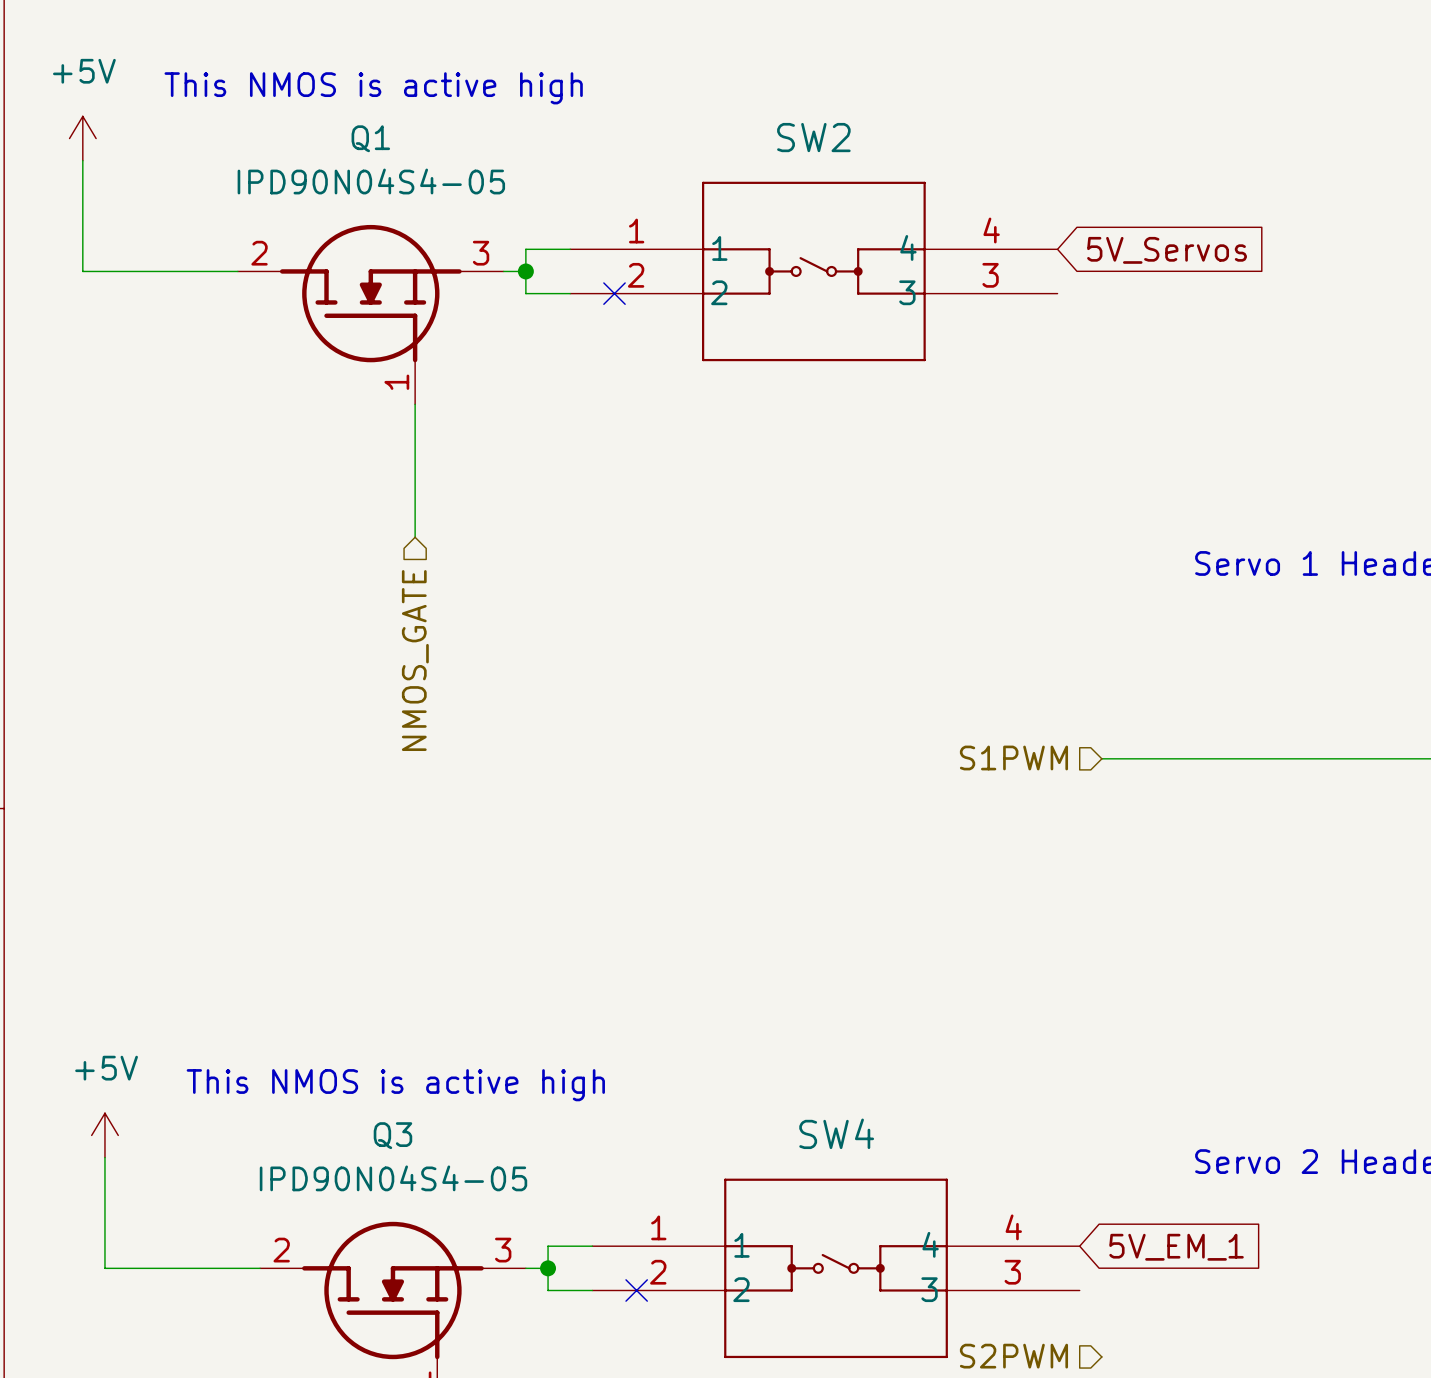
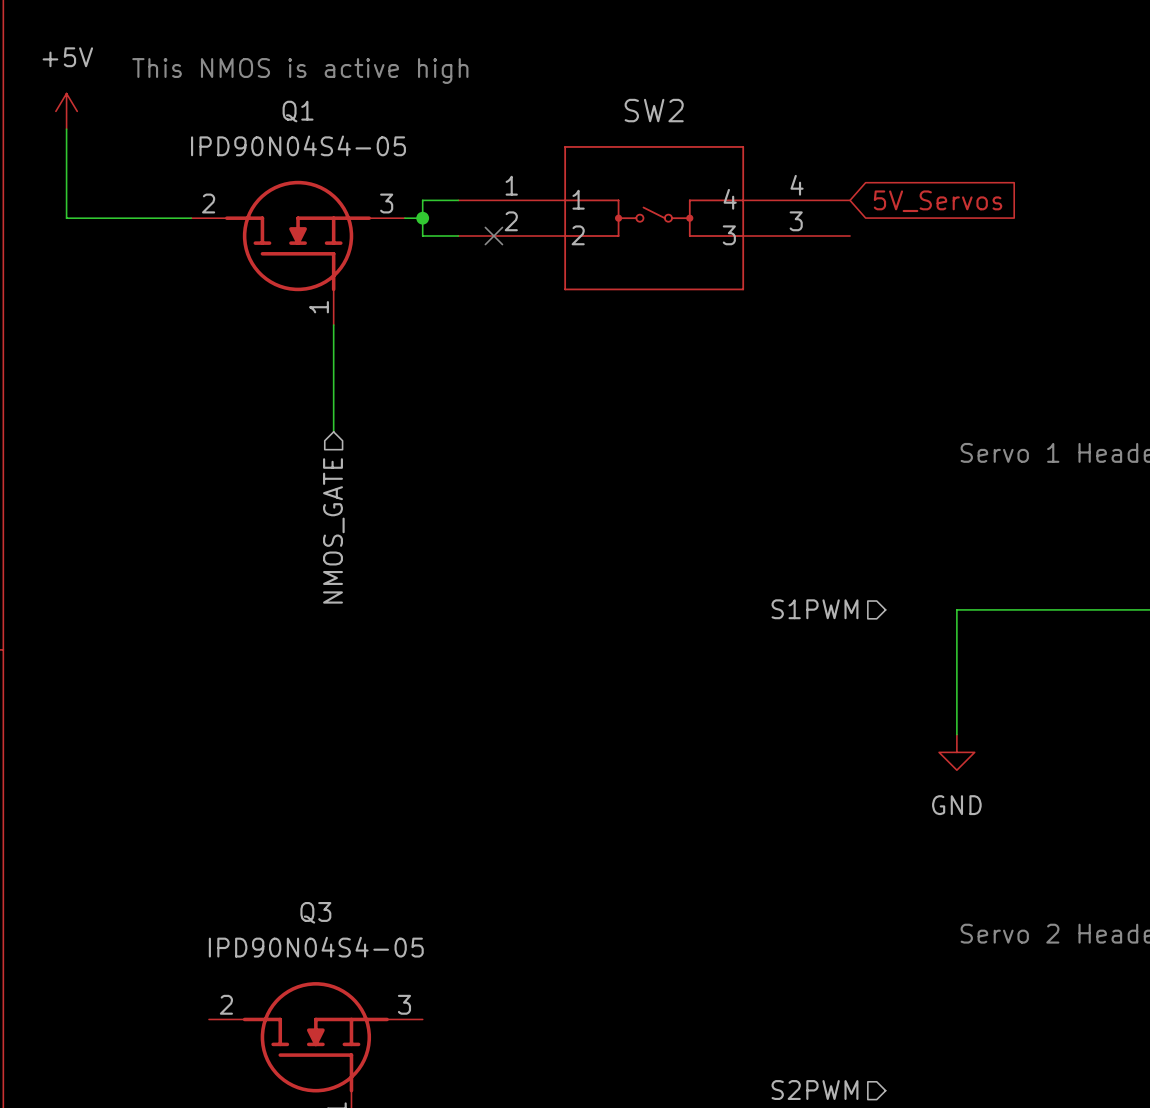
wire: (1101, 758) (1190, 758) -> (956, 734) (956, 609)
power symbol: none -> GND (956, 752)
text: This NMOS is active high (395, 1085) -> none
power symbol: +5V (104, 1135) -> none
wire: (104, 1157) (104, 1268) (260, 1268) -> none
wire: (592, 1246) (548, 1246) (548, 1290) (592, 1290) -> none
global label: 5V_EM_1 (1176, 1247) -> none
wire: (525, 1268) (548, 1268) -> none
junction: (548, 1268) -> none
SW4: (836, 1268) -> none
no-connect mark: (636, 1290) -> none

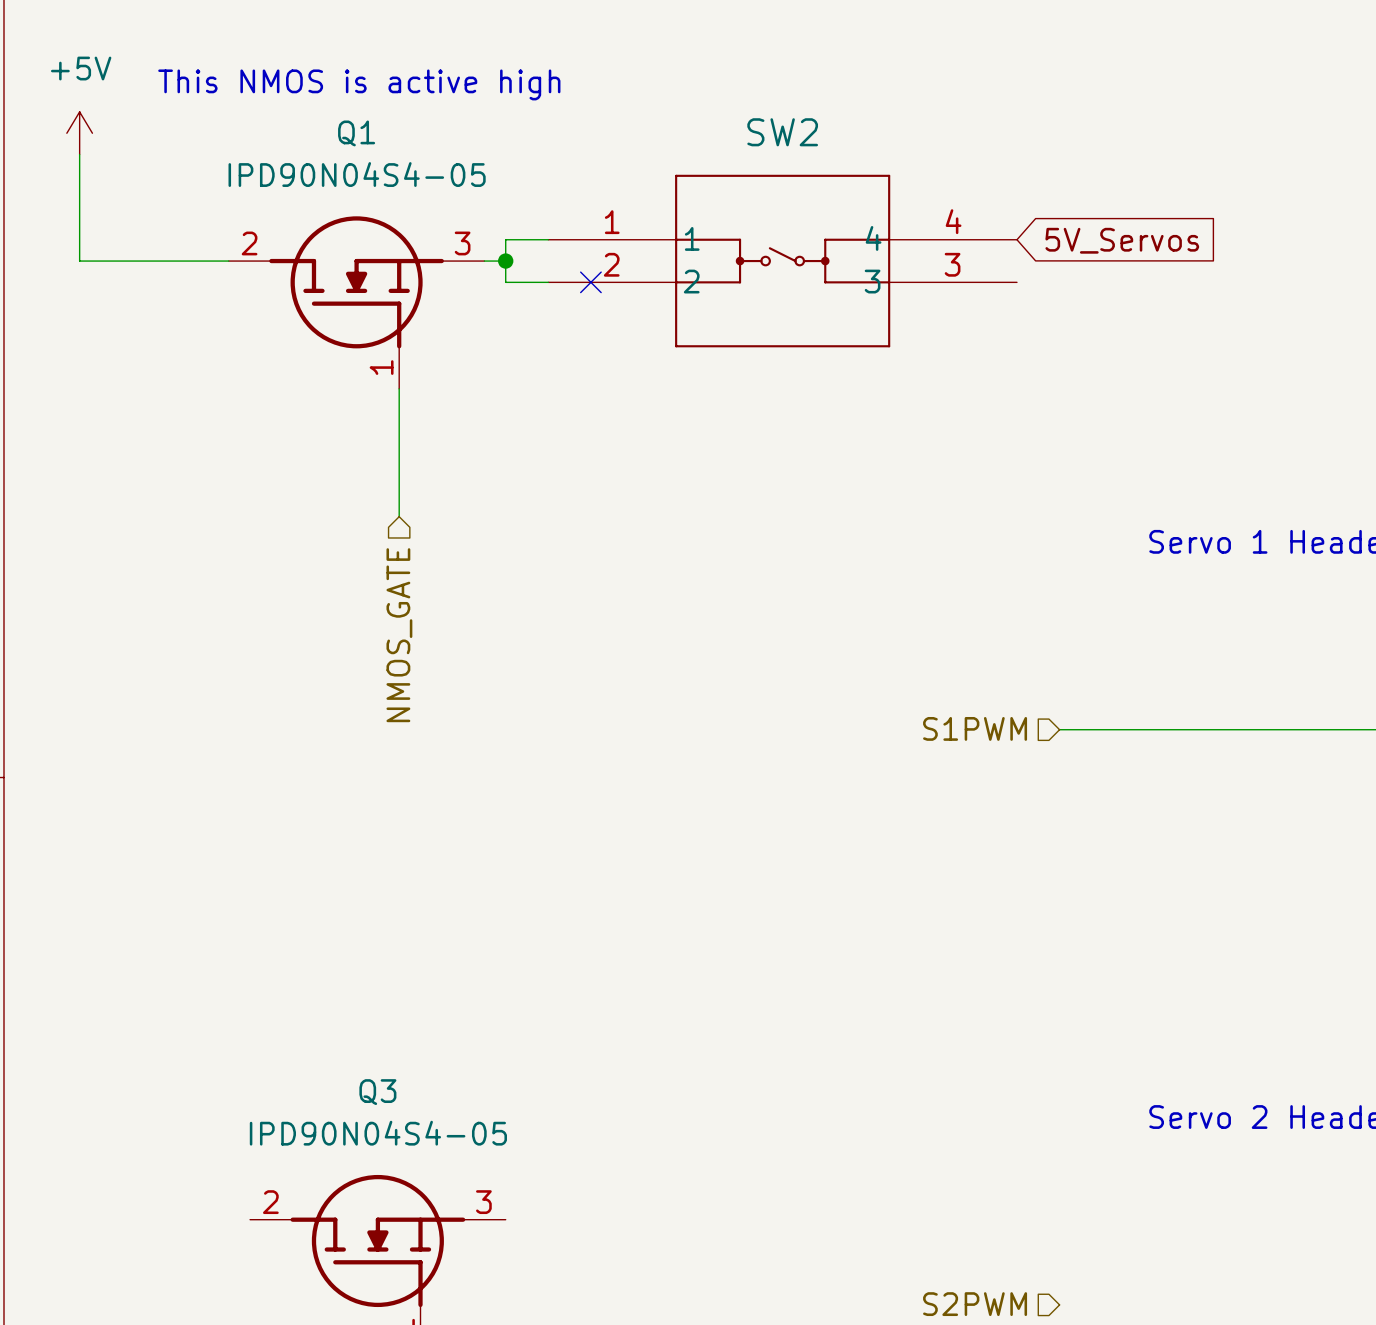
wire: (956, 609) (956, 734) -> (1144, 729) (1059, 729)
power symbol: GND (956, 752) -> none

